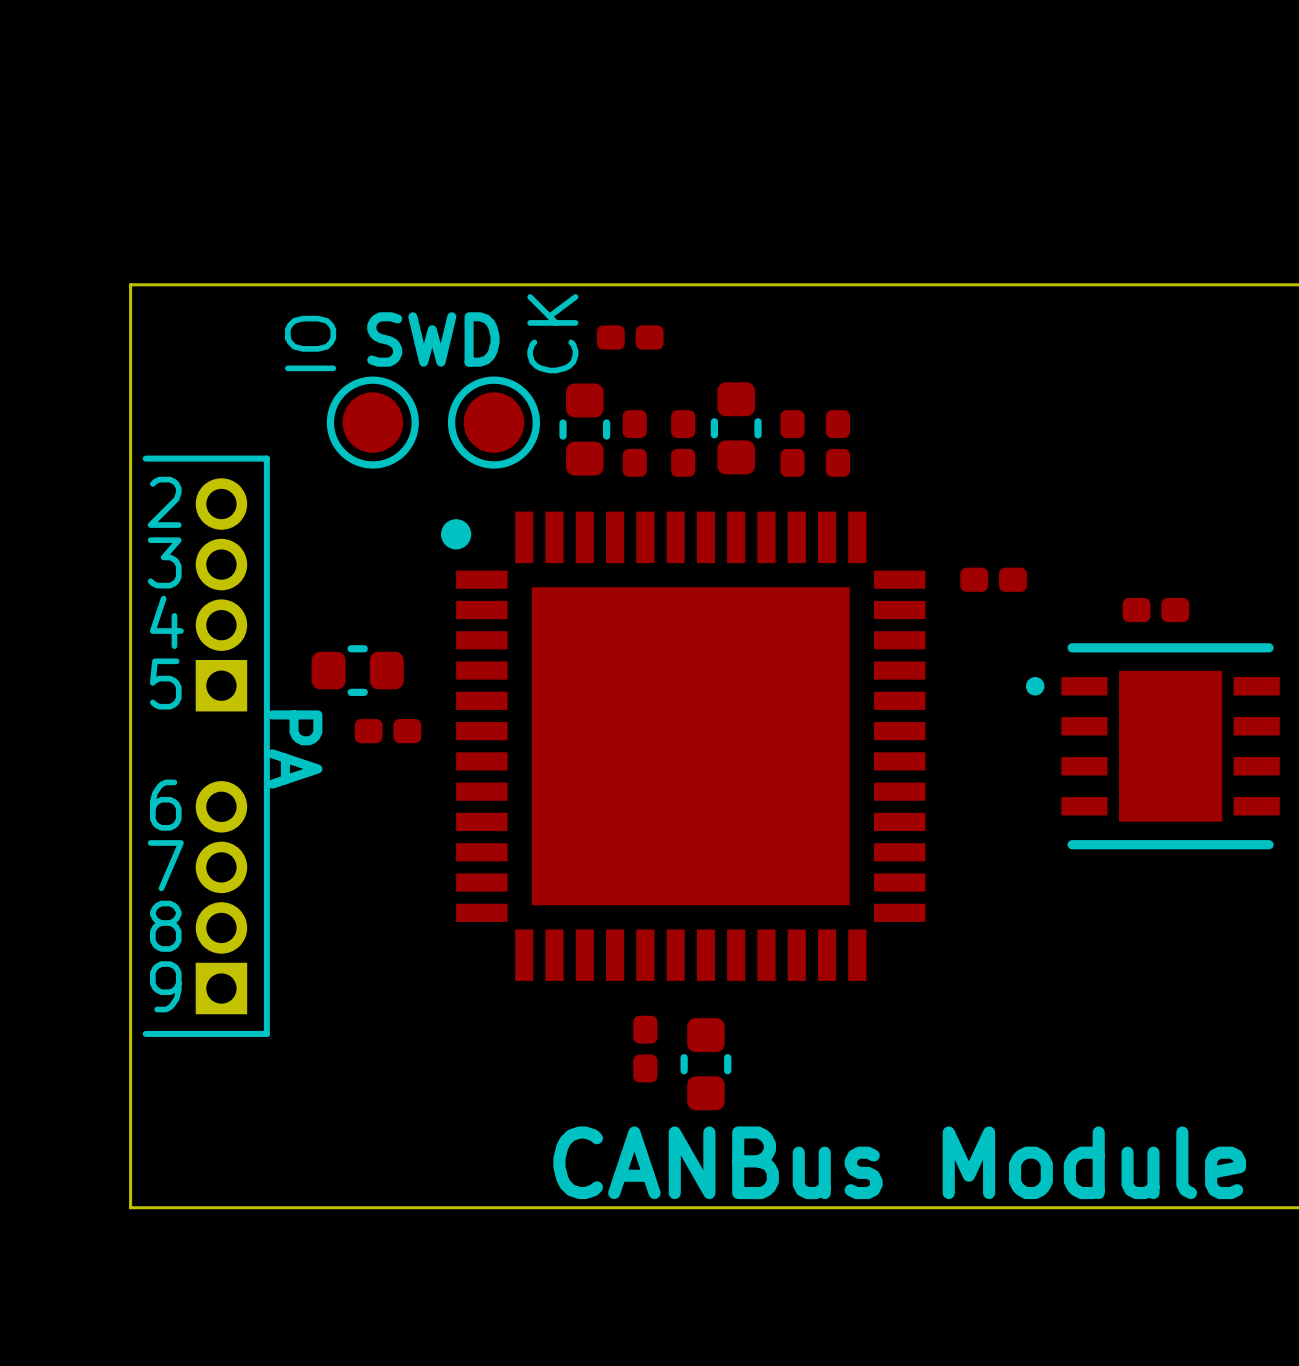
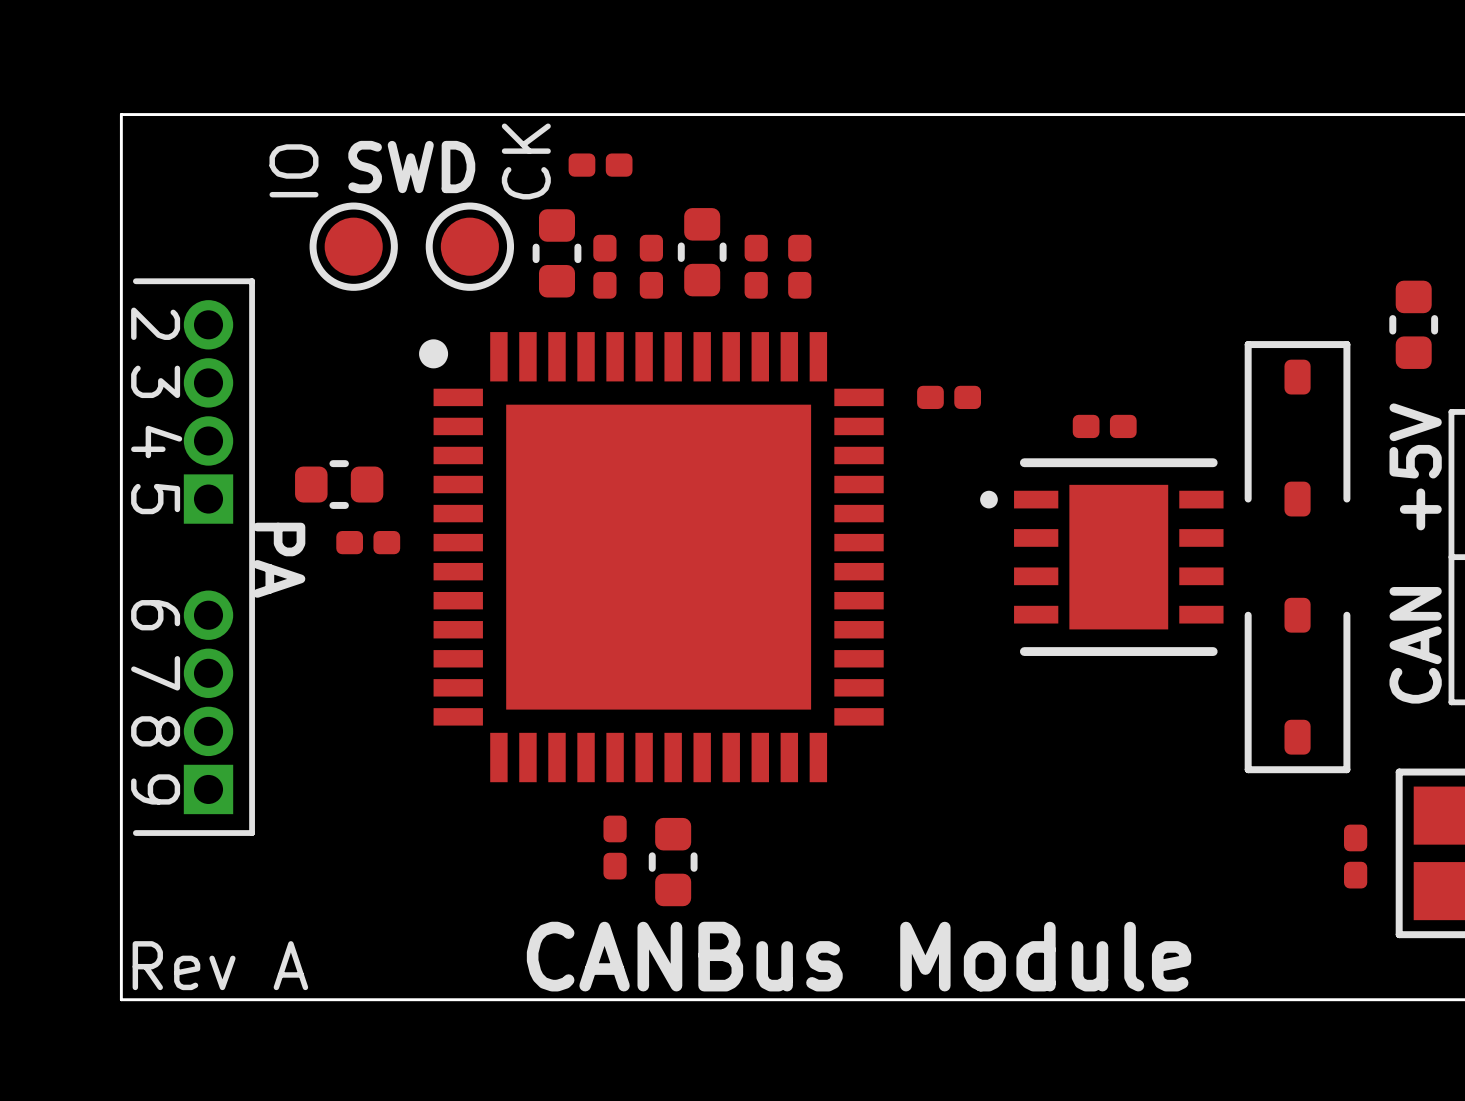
text rotation: 0° (164, 502) -> 90° clockwise (155, 323)
text rotation: 0° (164, 562) -> 90° clockwise (155, 381)
text rotation: 0° (166, 622) -> 90° clockwise (156, 442)
text rotation: 0° (165, 684) -> 90° clockwise (155, 499)
text rotation: 0° (165, 805) -> 90° clockwise (155, 615)
text rotation: 0° (165, 865) -> 90° clockwise (155, 673)
text rotation: 0° (165, 926) -> 90° clockwise (155, 731)
text rotation: 0° (165, 986) -> 90° clockwise (155, 789)
text: none -> Rev A (220, 965)

